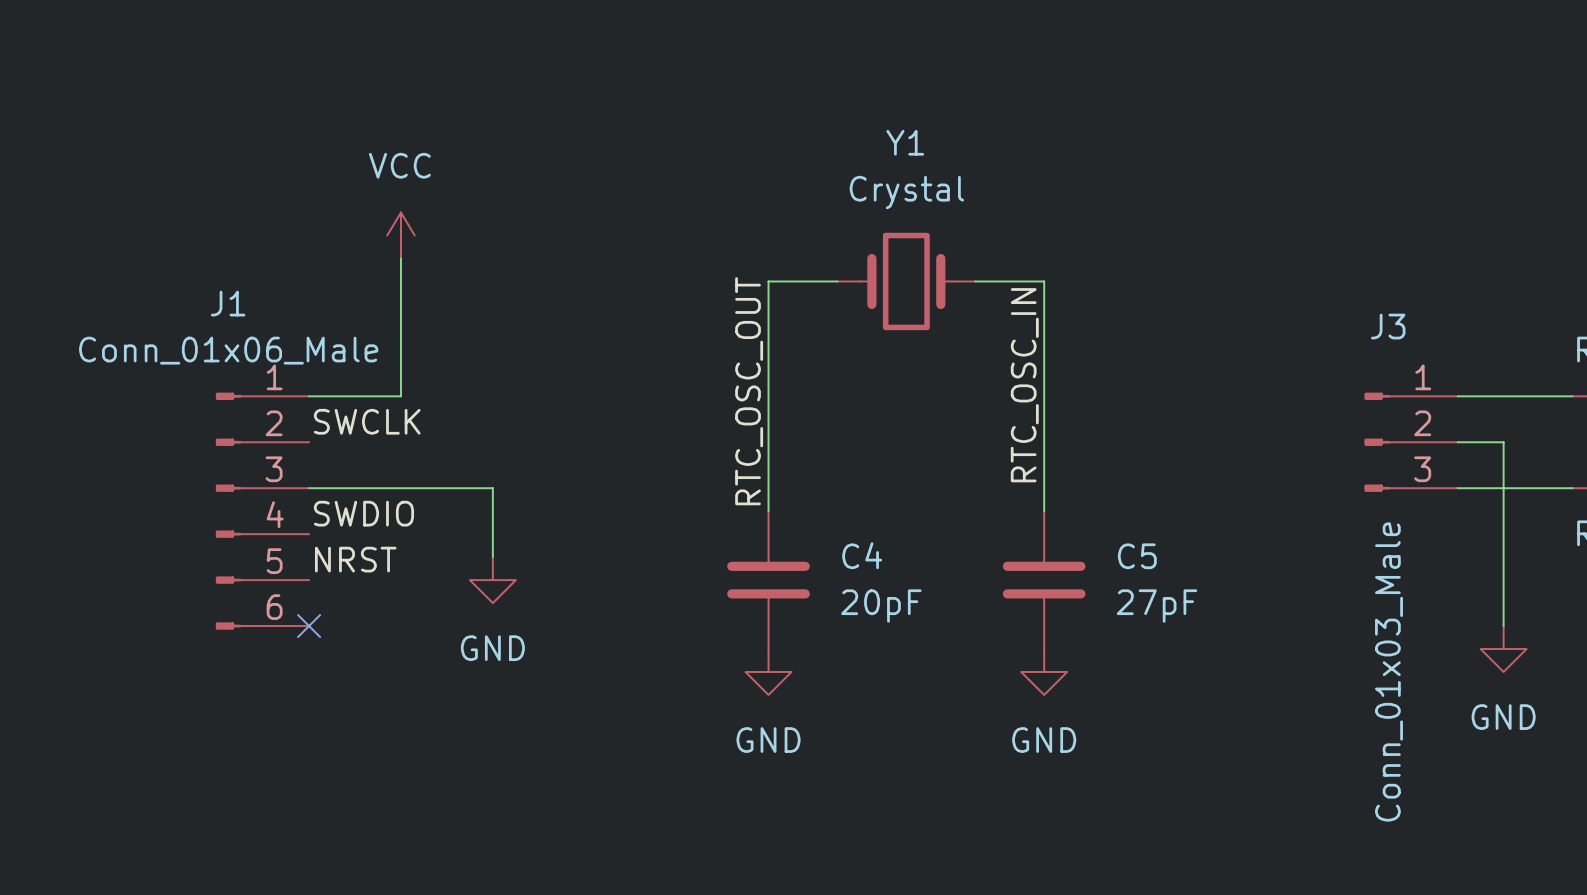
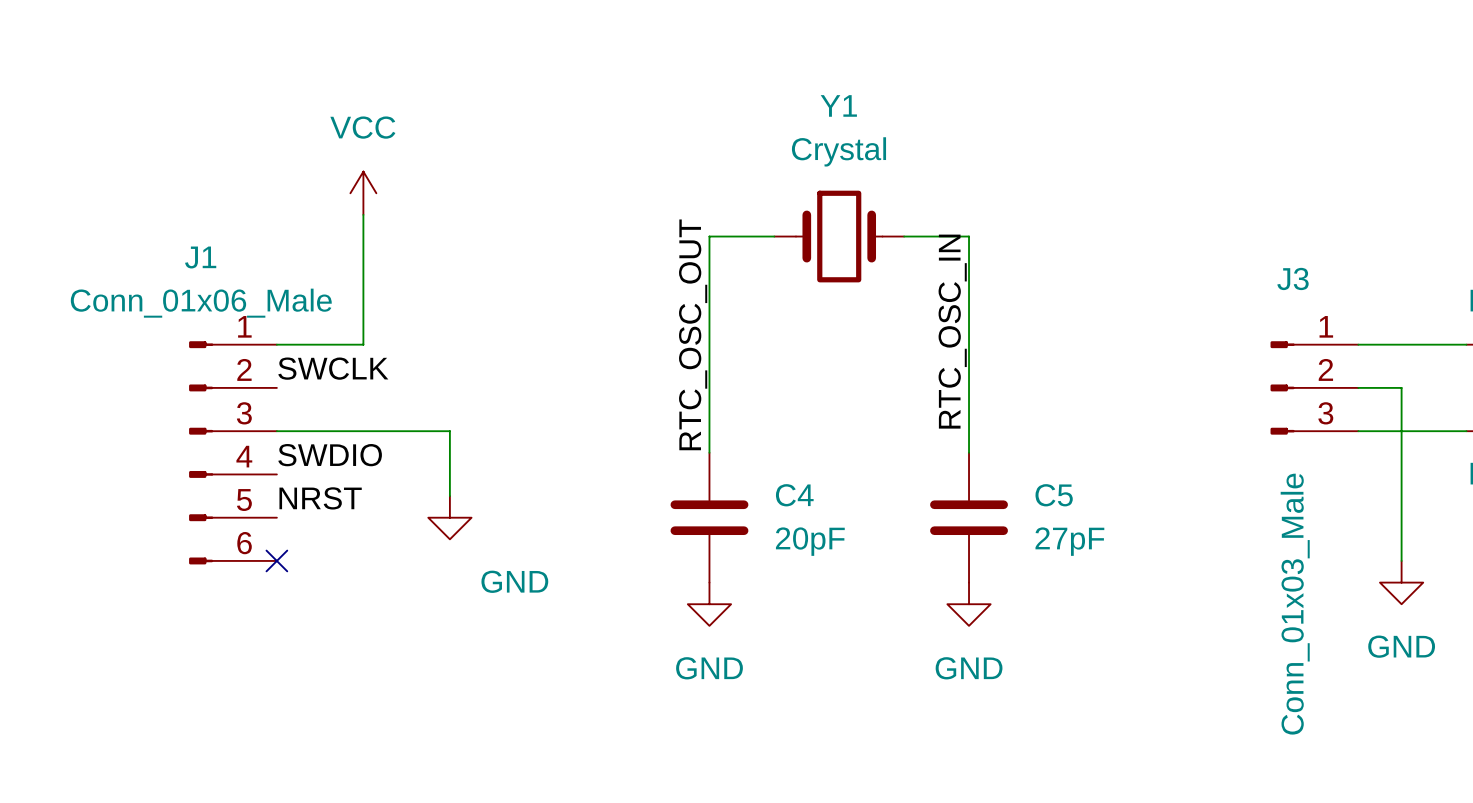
power symbol text position: GND (492, 648) -> GND (514, 581)

